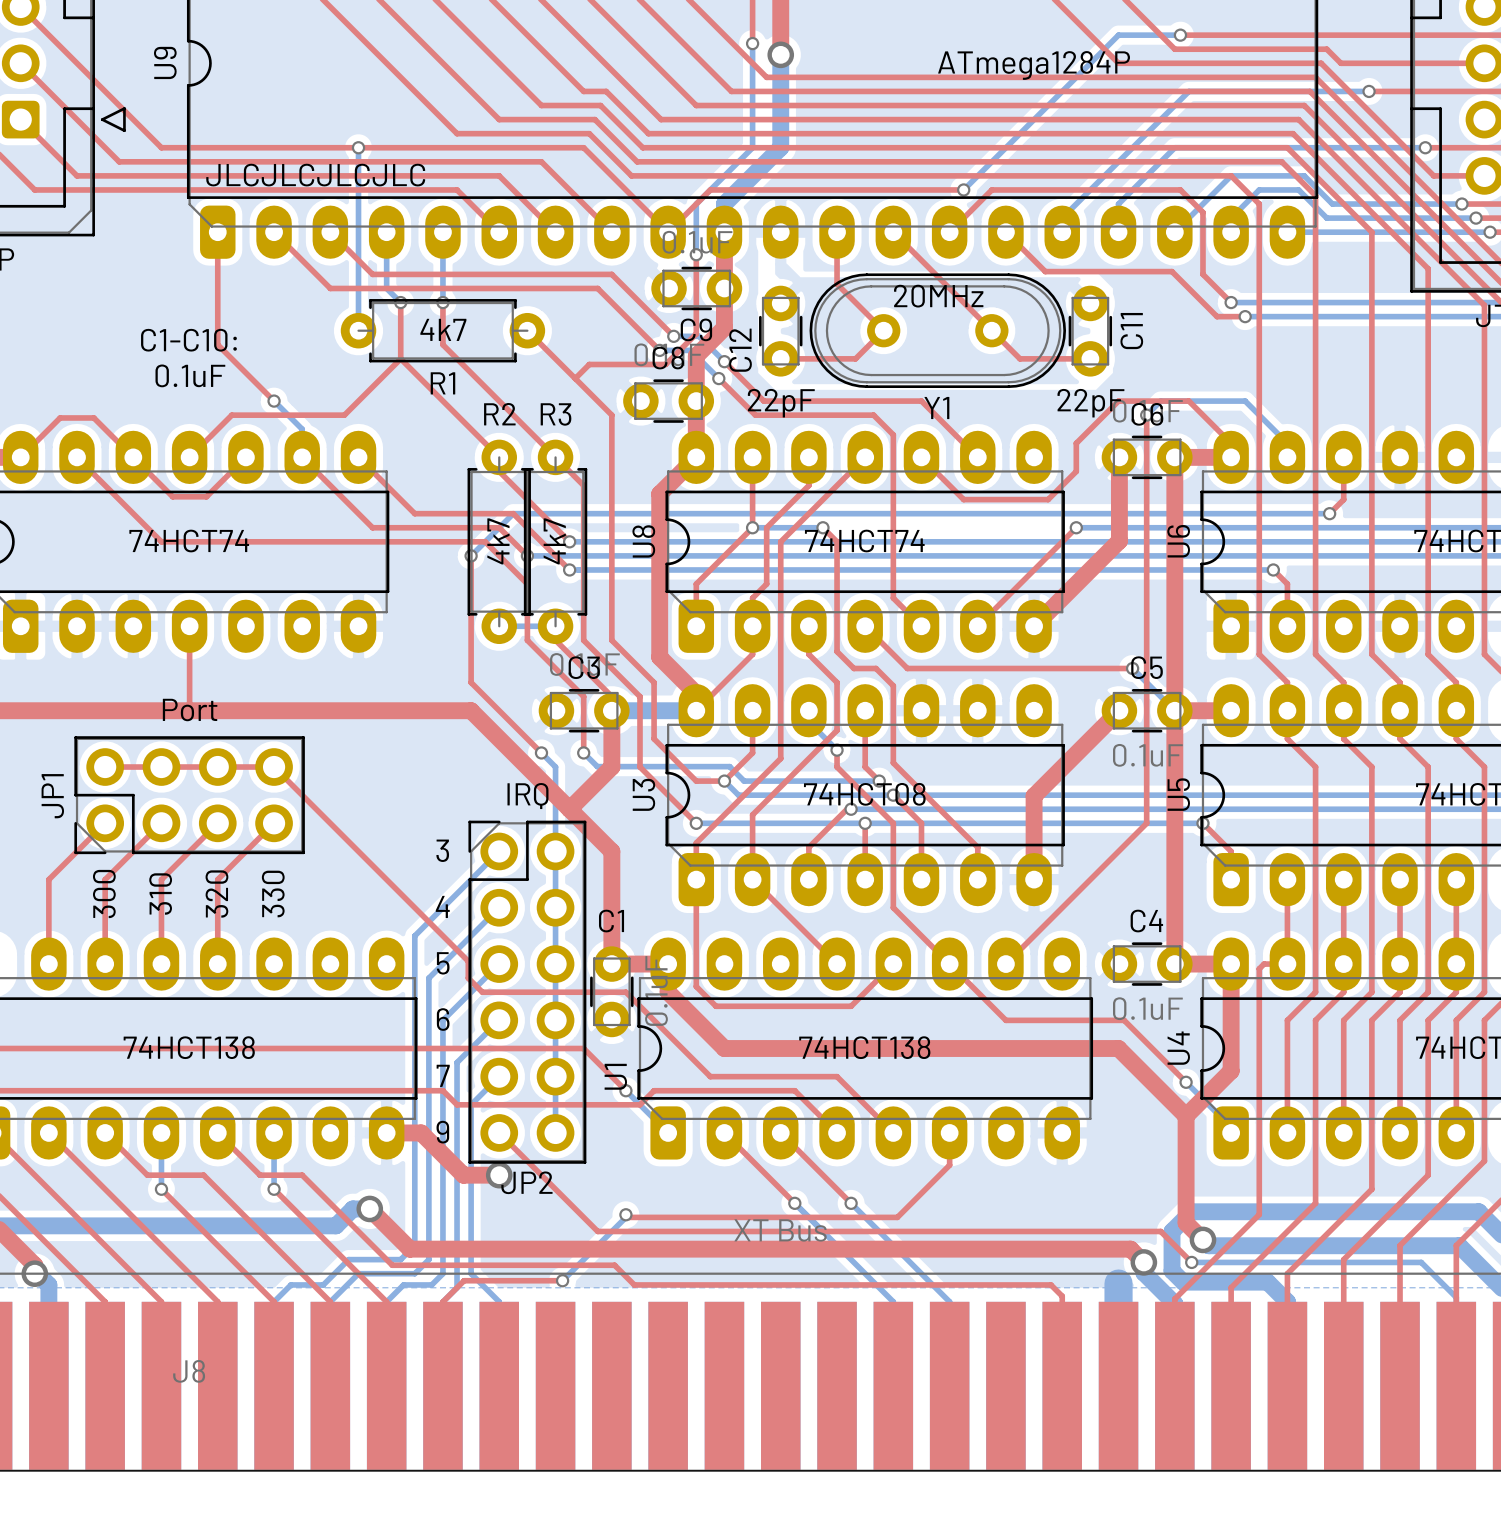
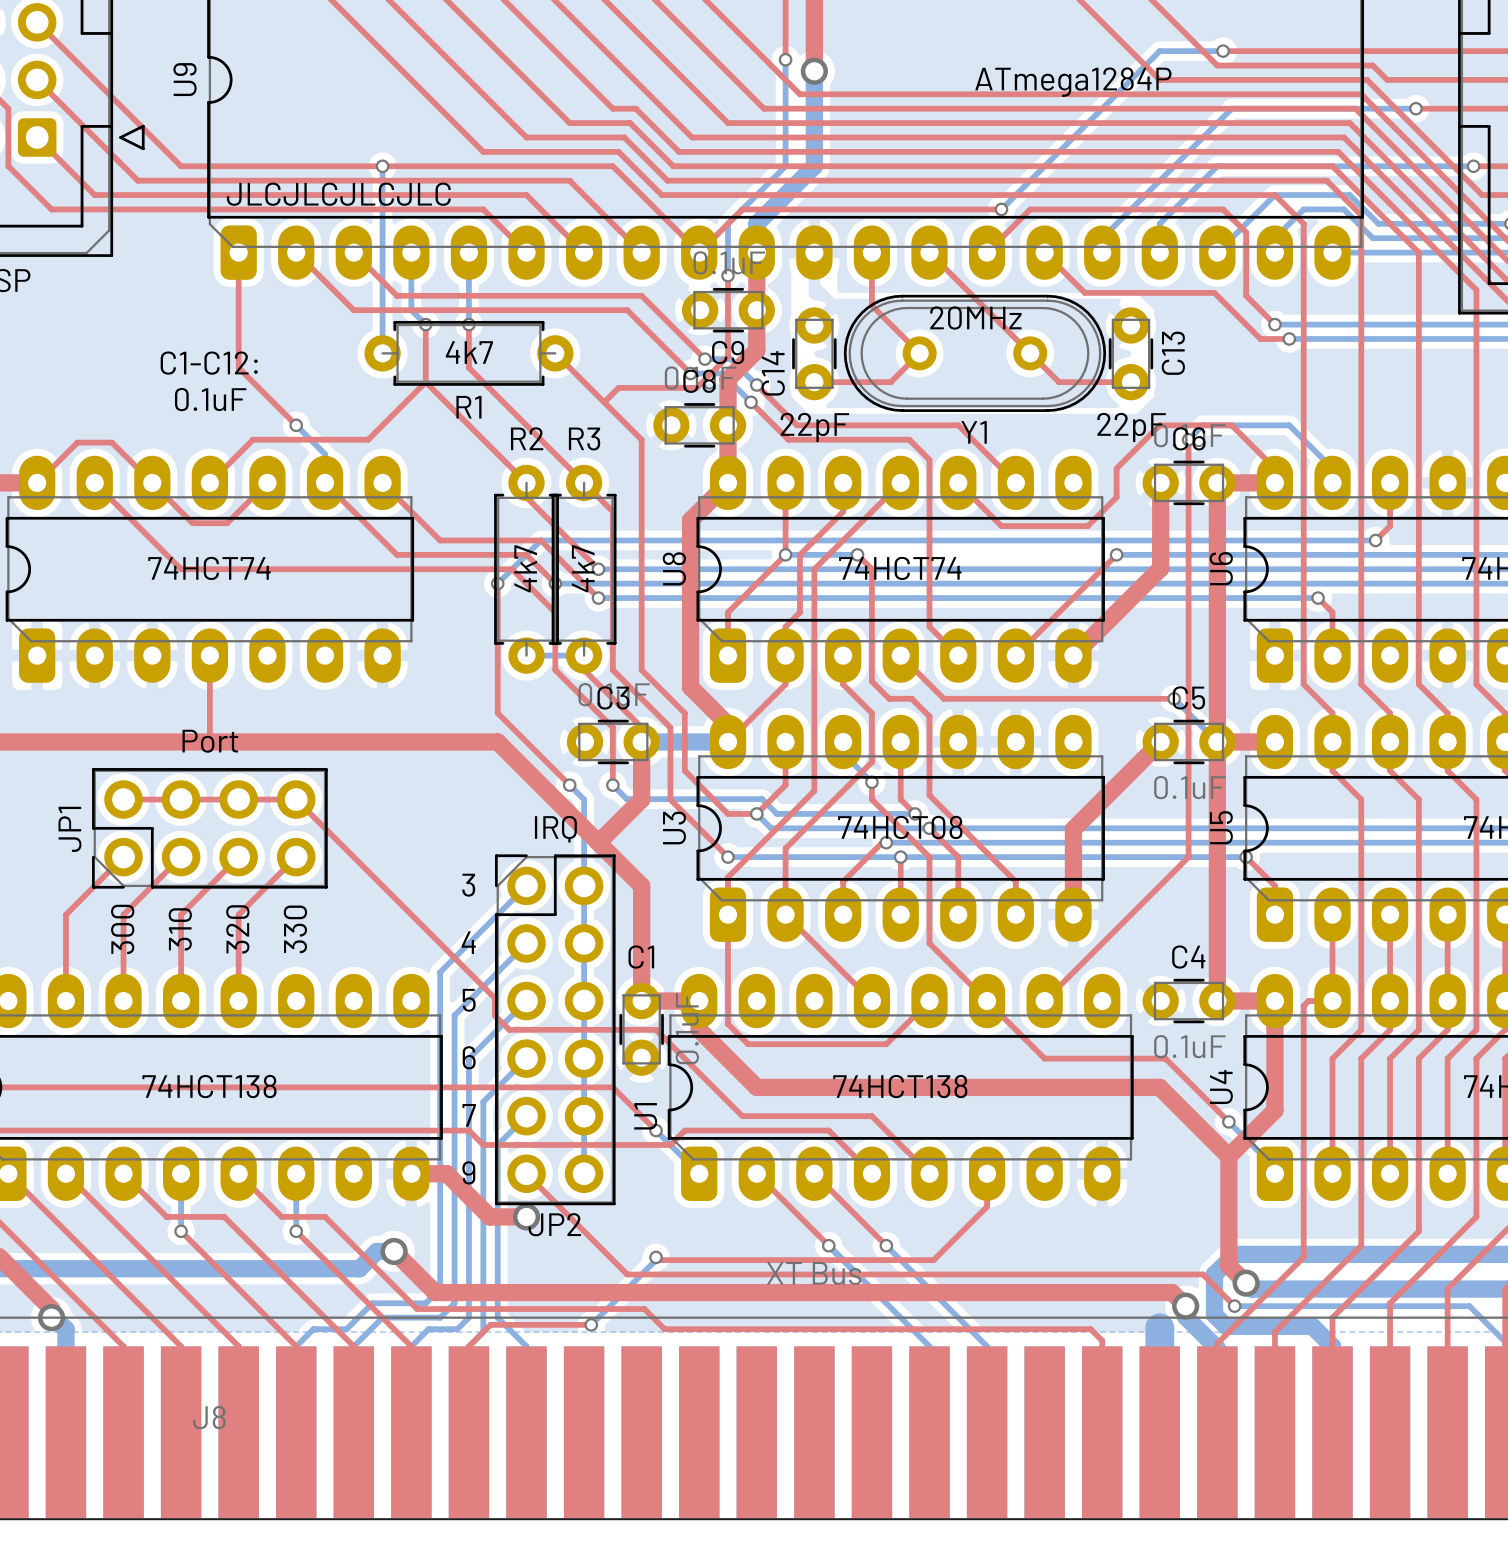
C11 name: C11 (1131, 331) -> C13 (1173, 353)
text: C1-C10: (188, 340) -> C1-C12: (209, 363)
C12 name: C12 (740, 350) -> C14 (773, 373)

